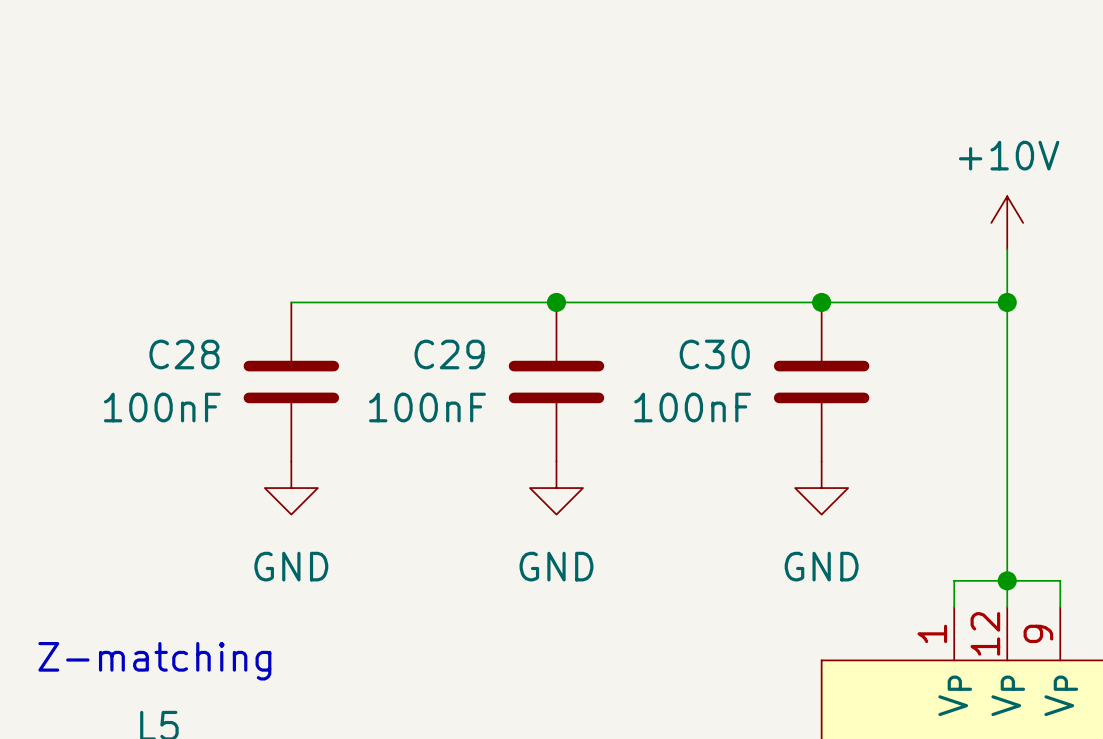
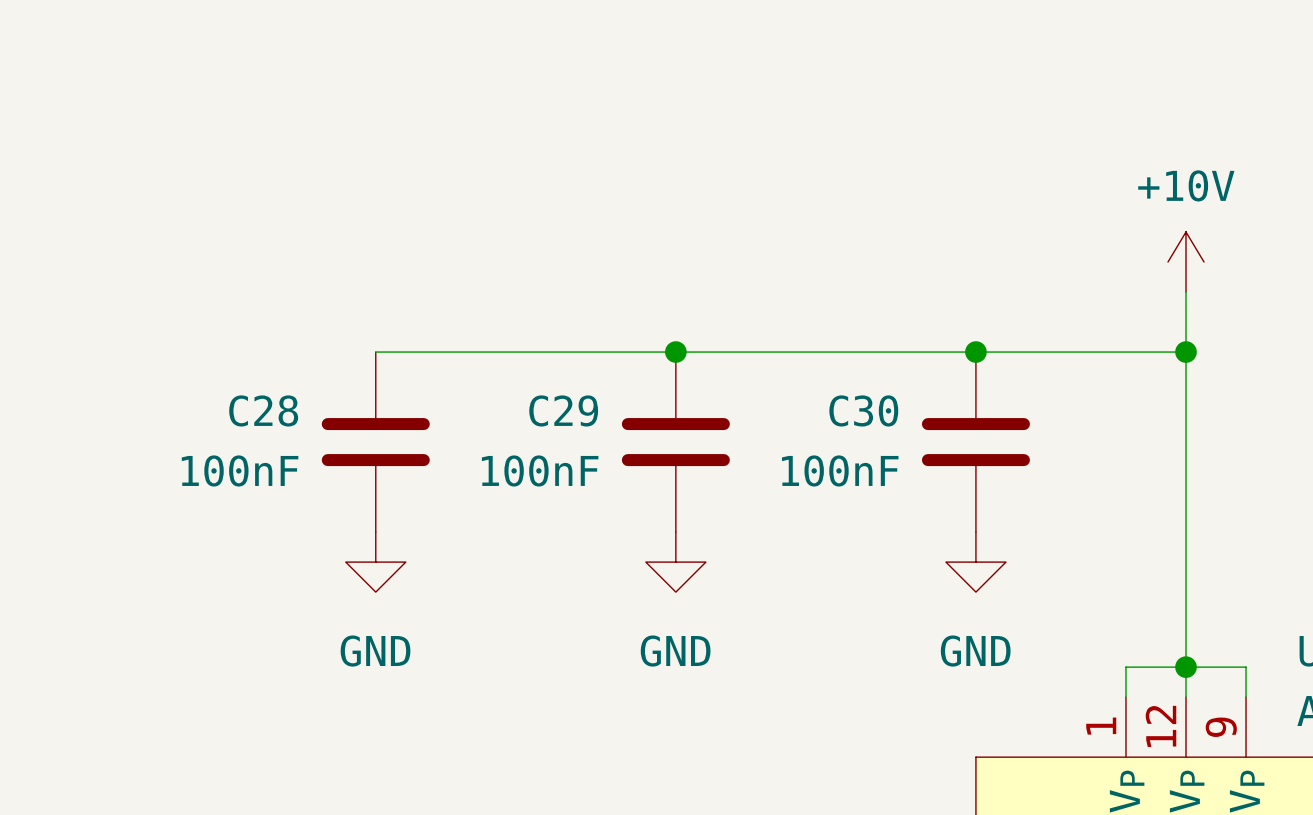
text: Z-matching (154, 661) -> none

